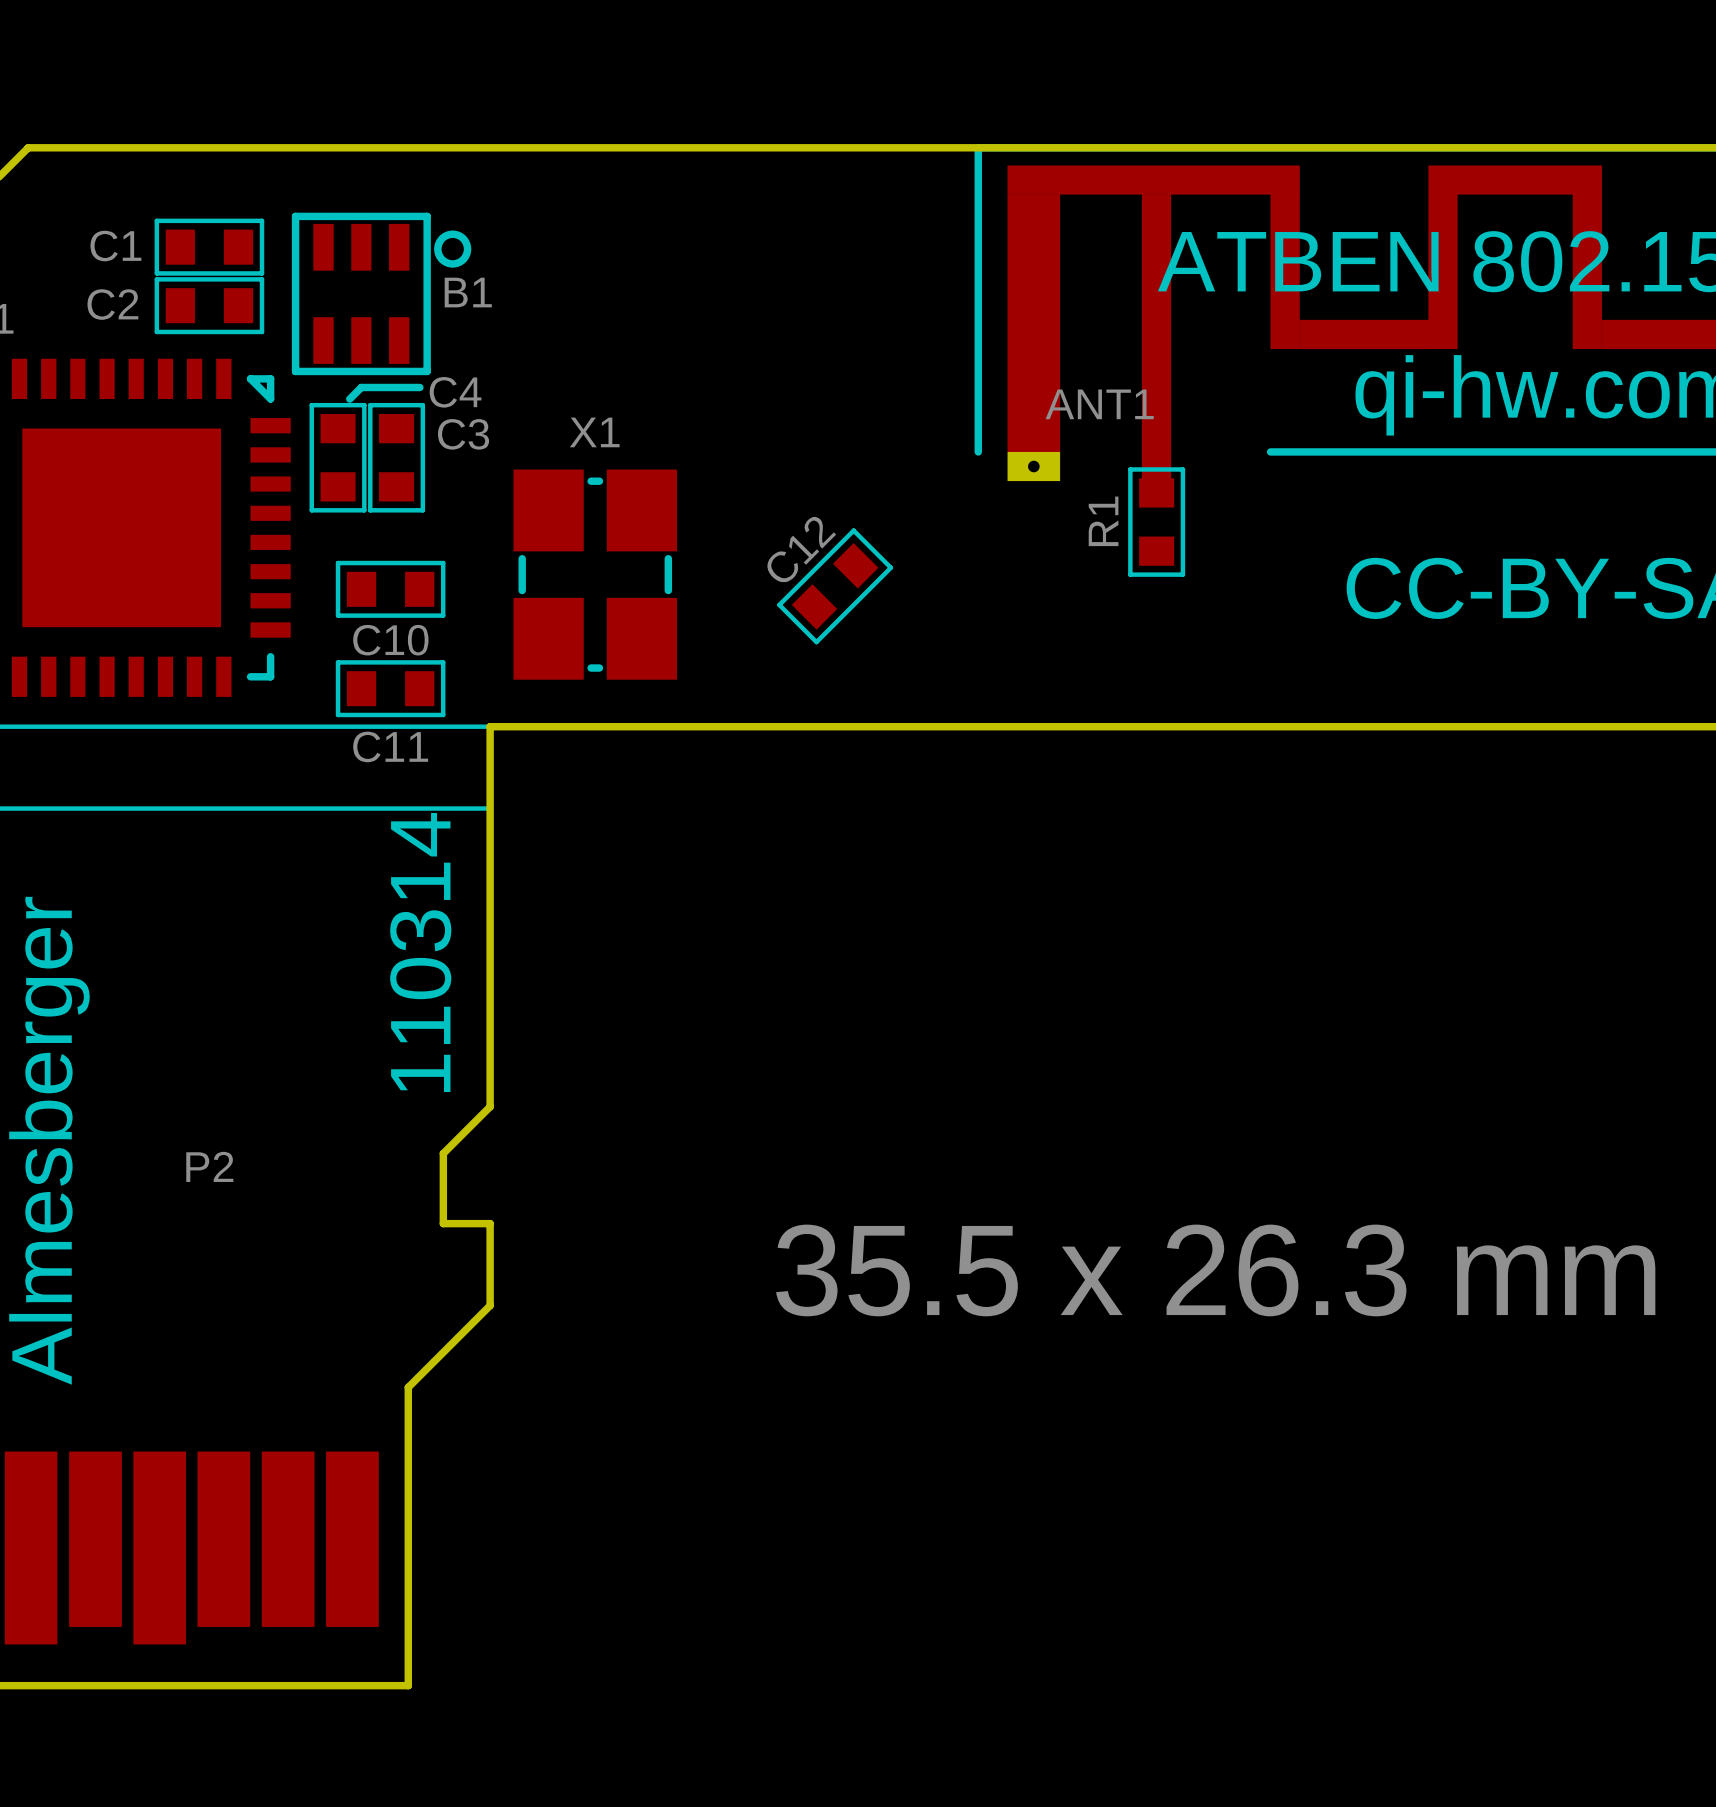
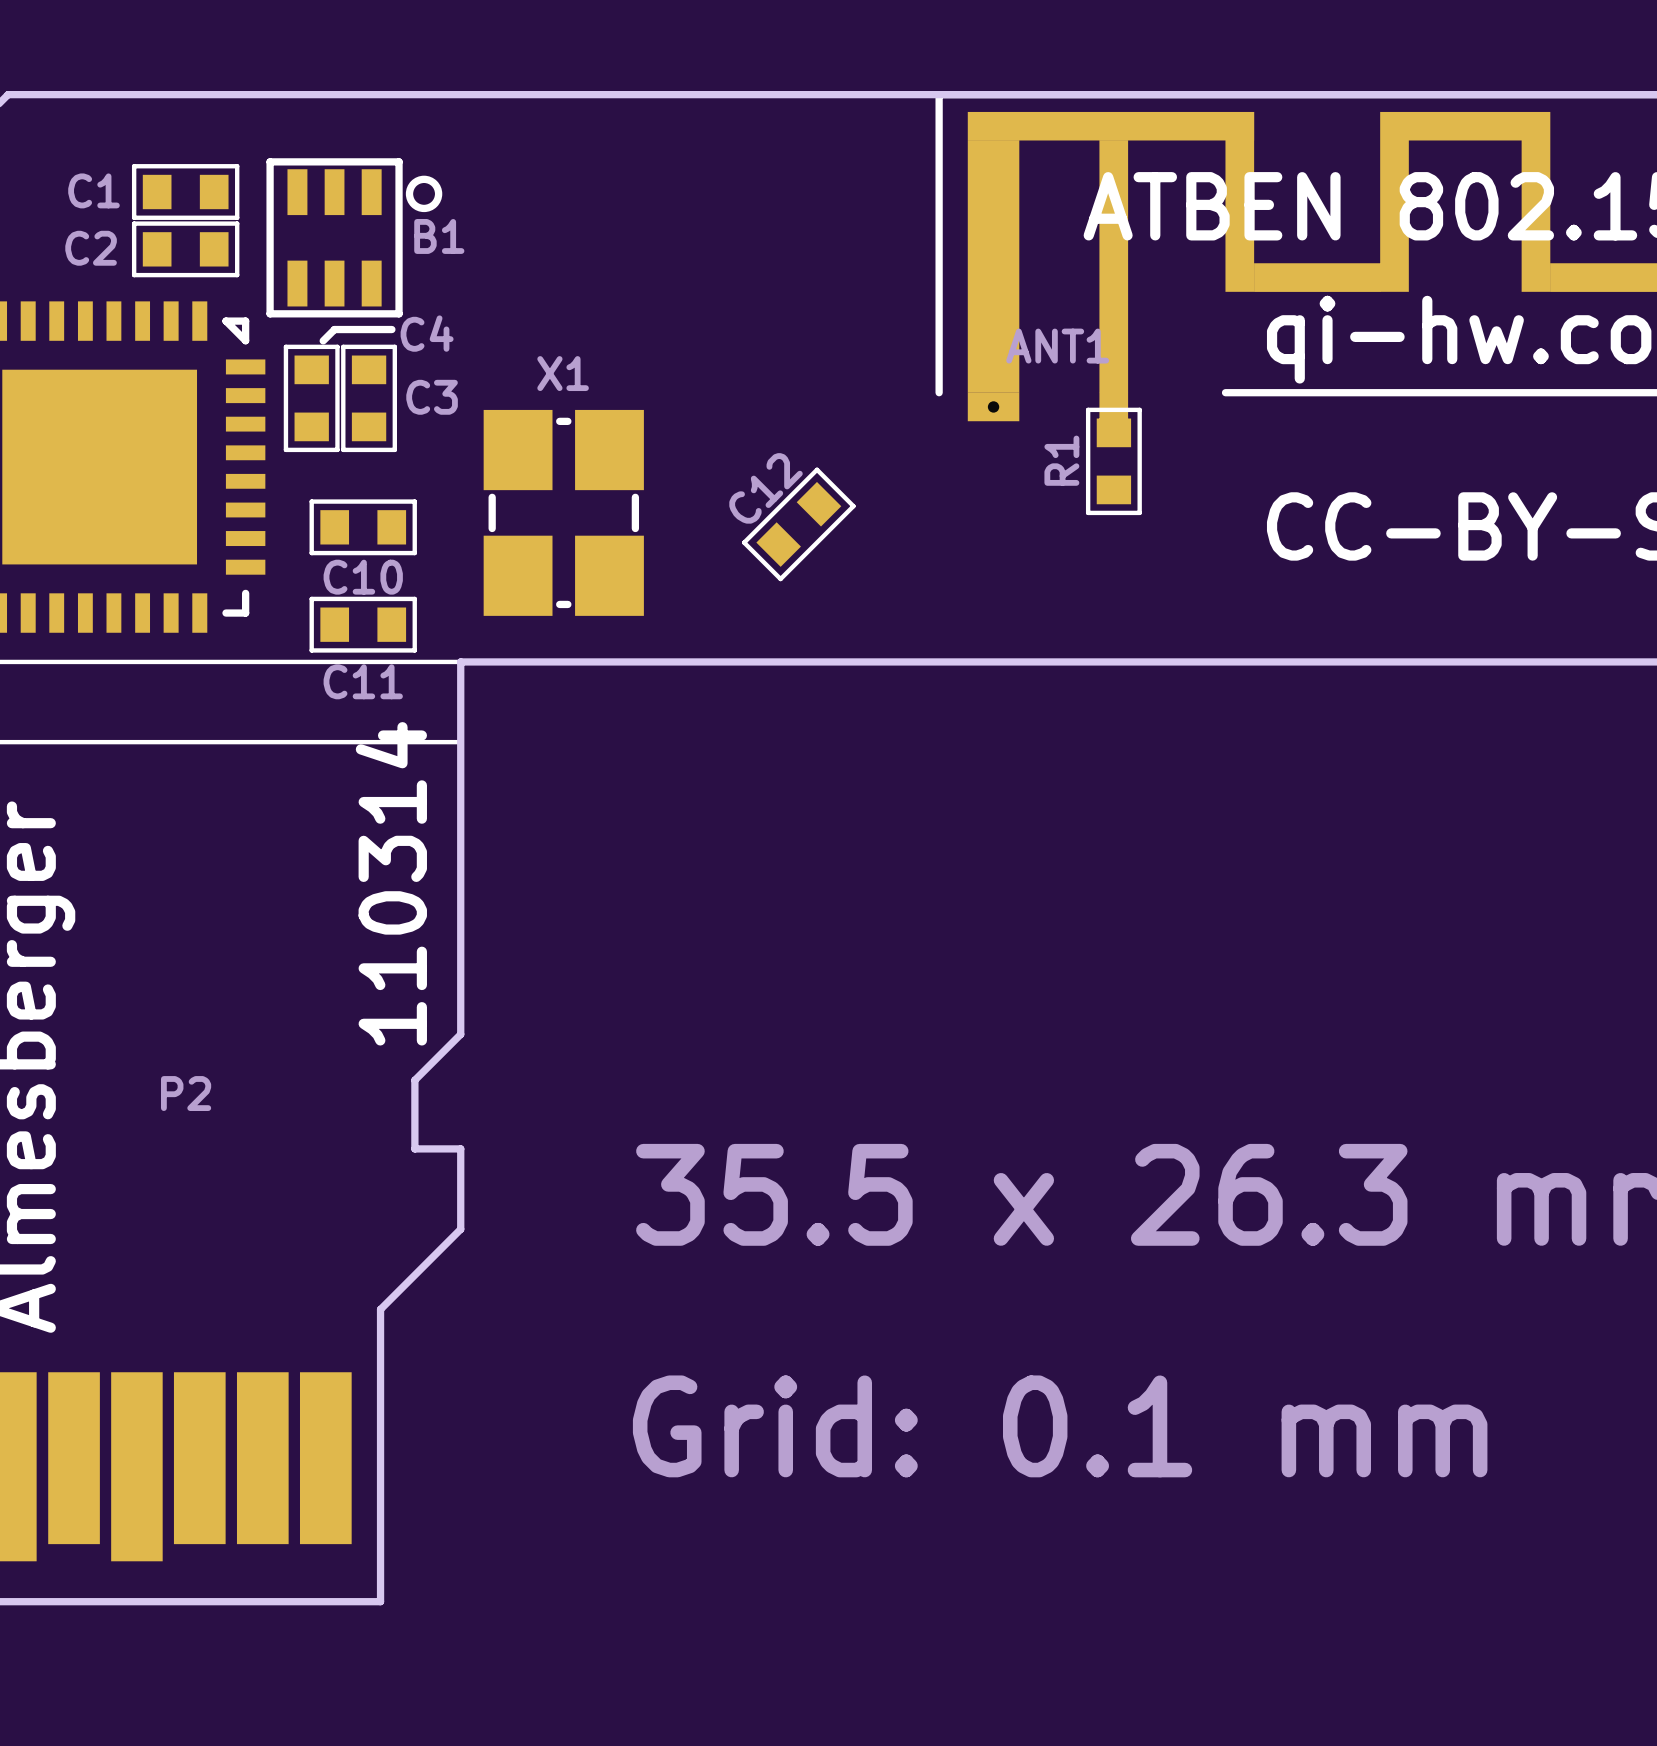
C3 name position: C3 (463, 434) -> C3 (432, 397)
text: none -> Grid: 0.1 mm (1060, 1426)

